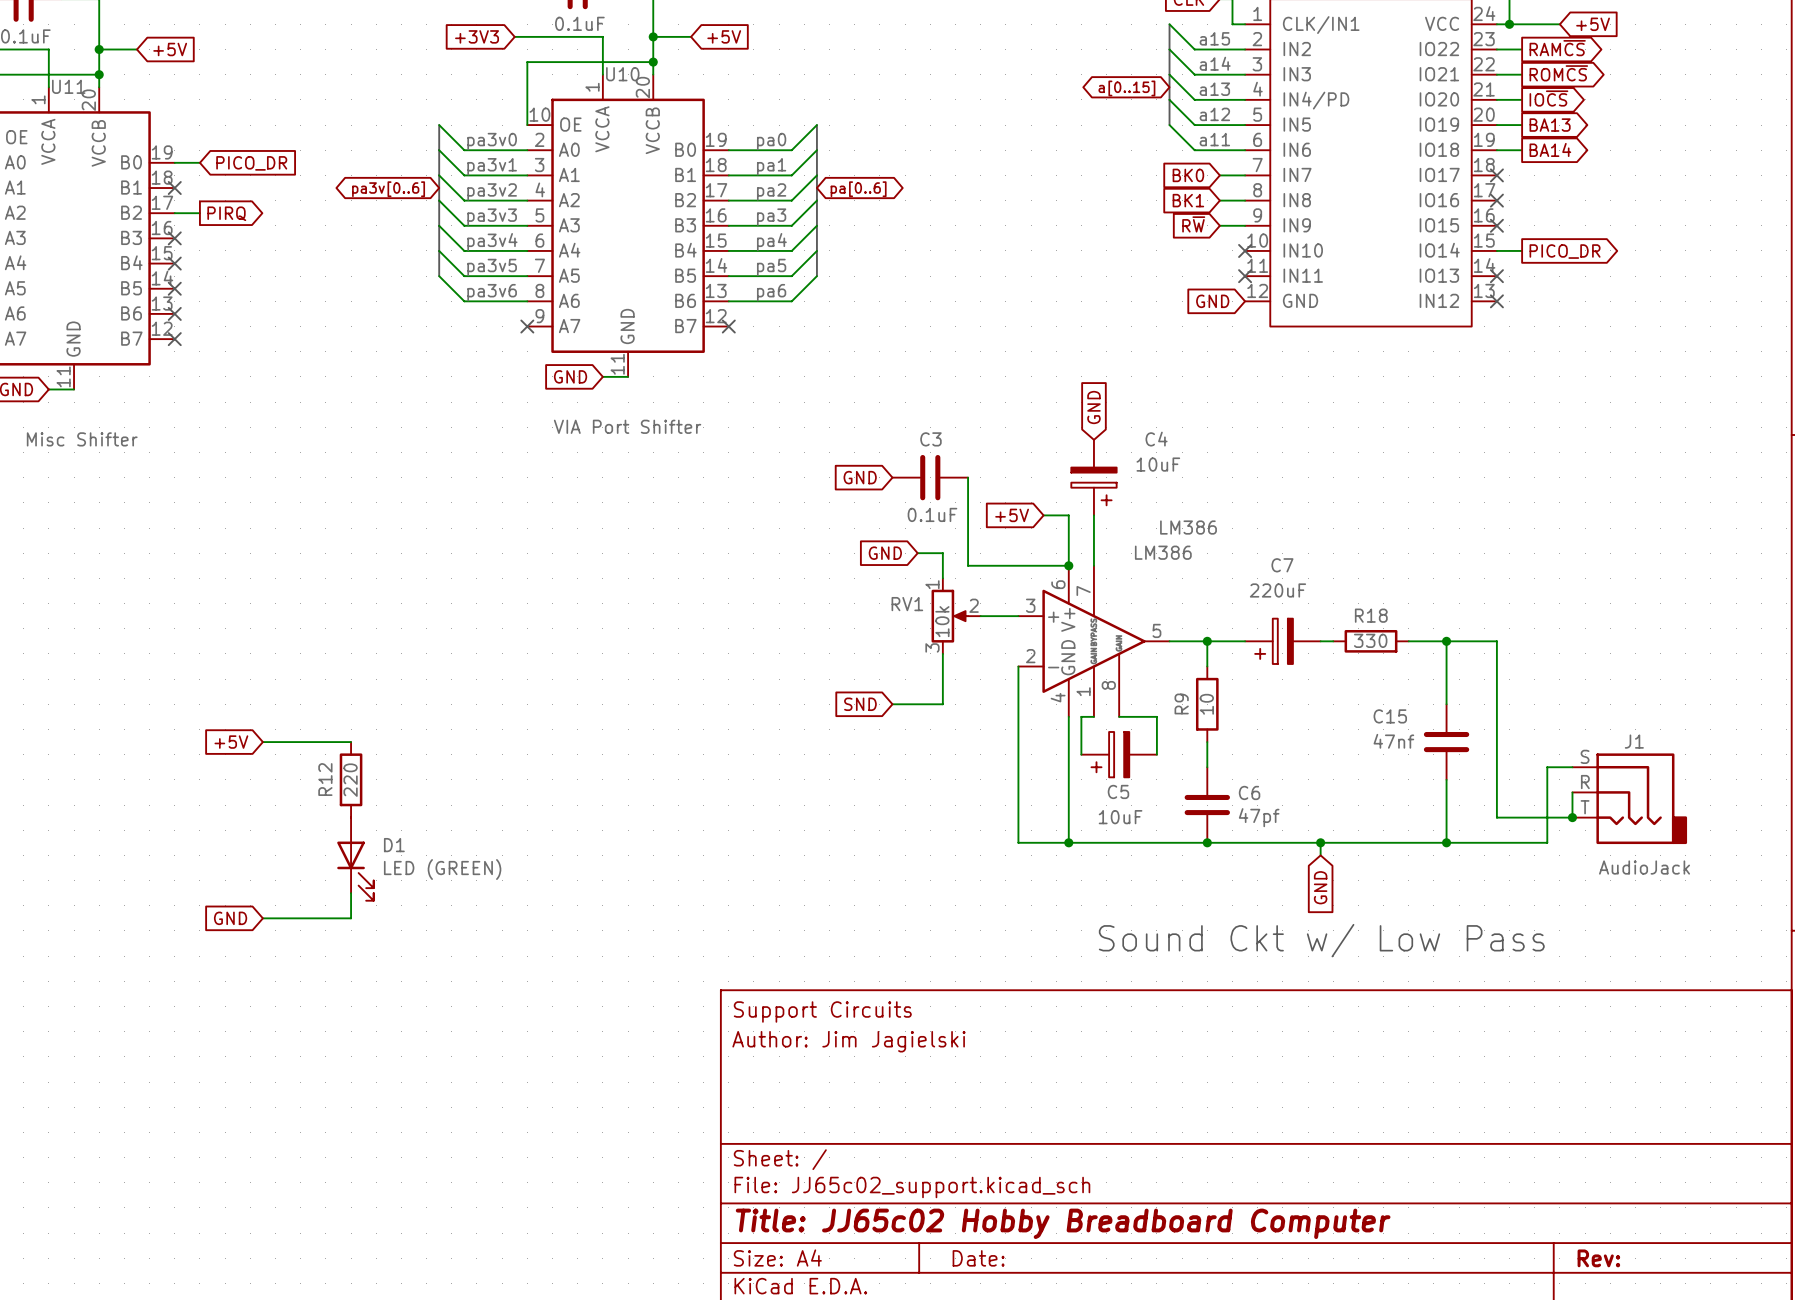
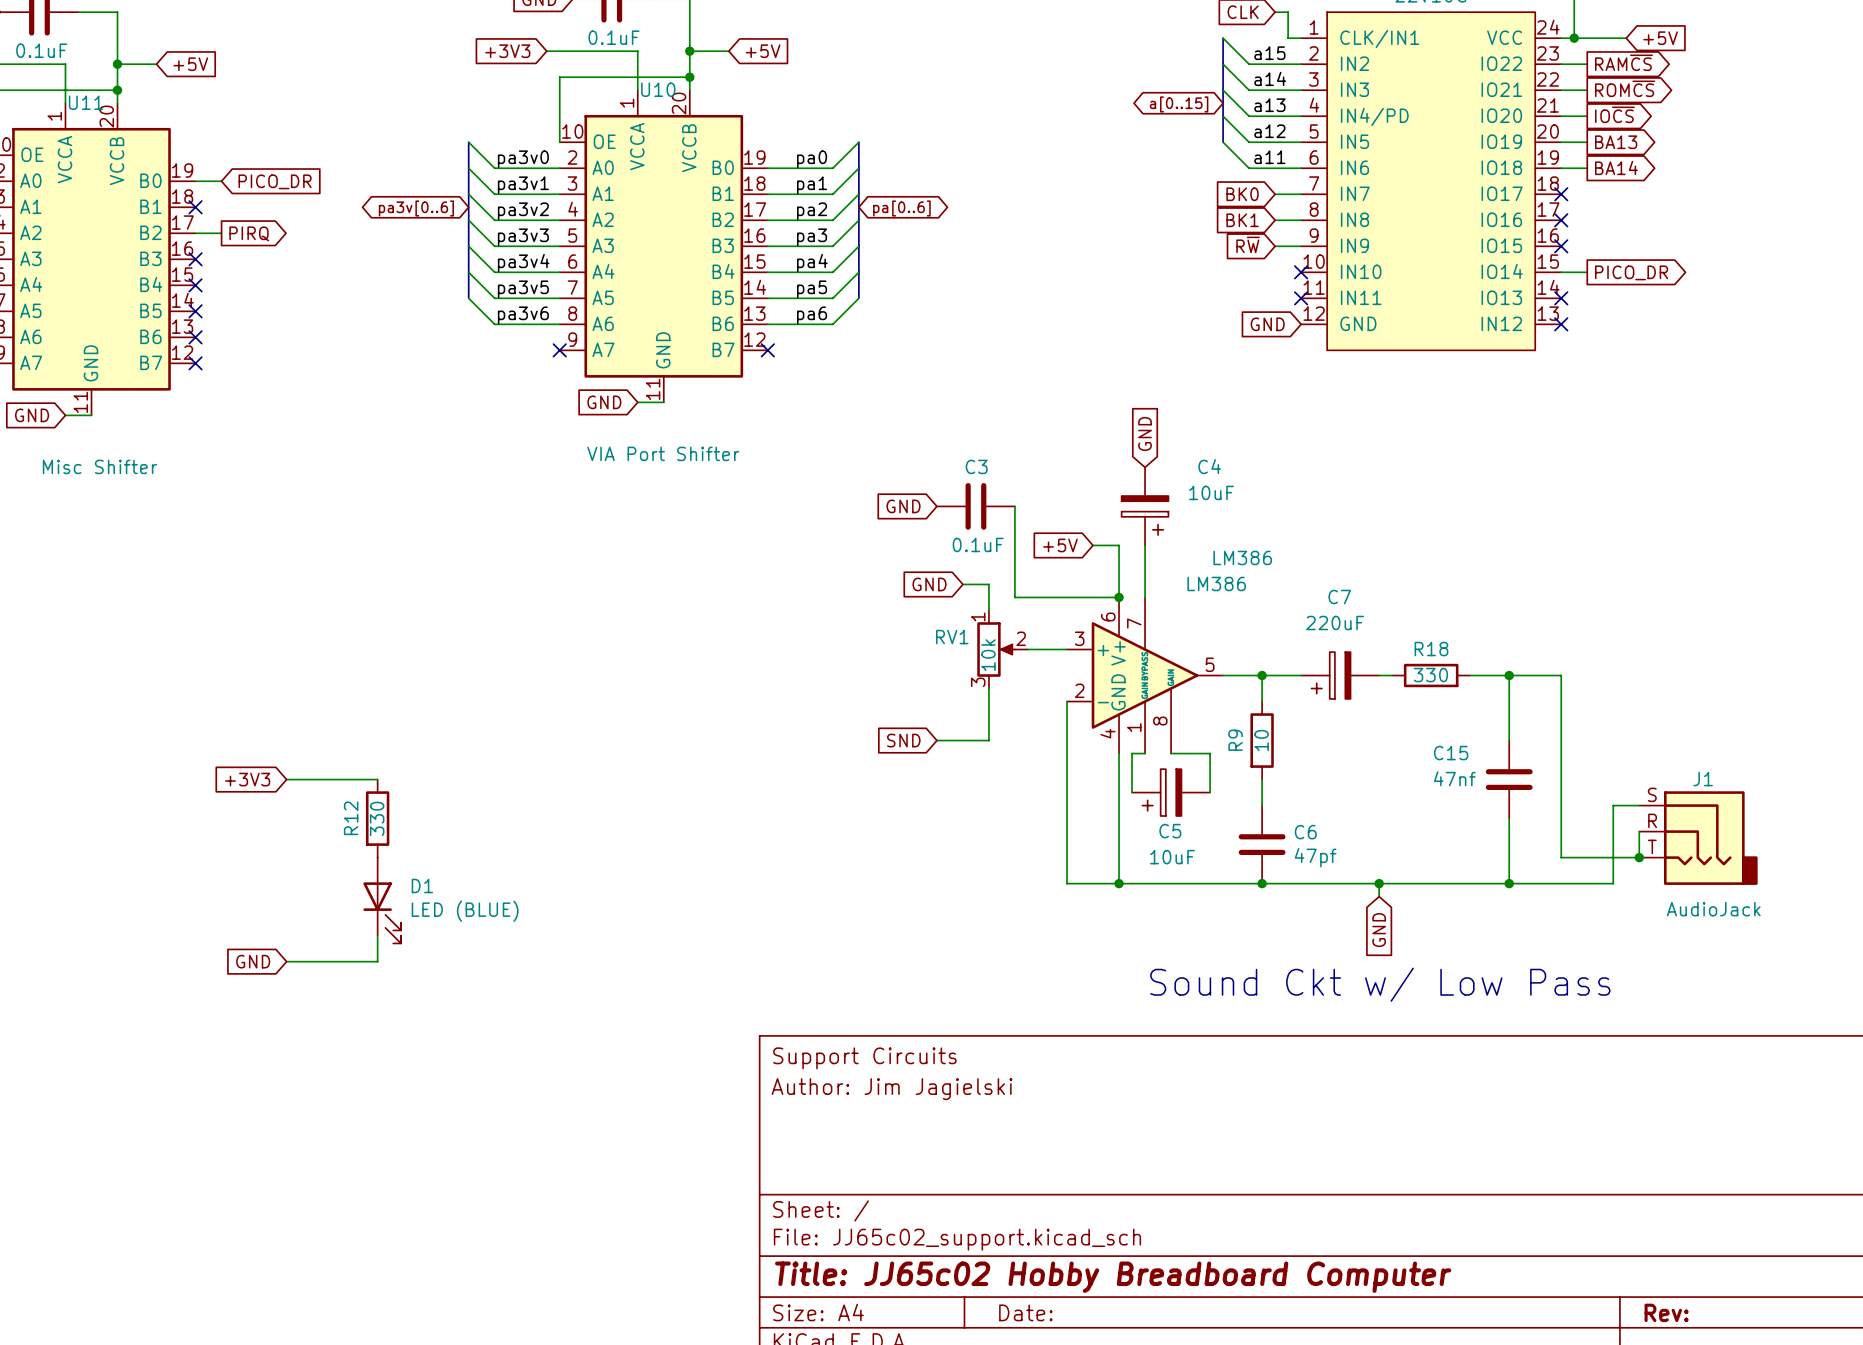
global label: +5V (231, 742) -> +3V3 (247, 779)
R12 value: 220 (350, 780) -> 330 (377, 818)
D1 value: LED (GREEN) (442, 869) -> LED (BLUE) (465, 911)

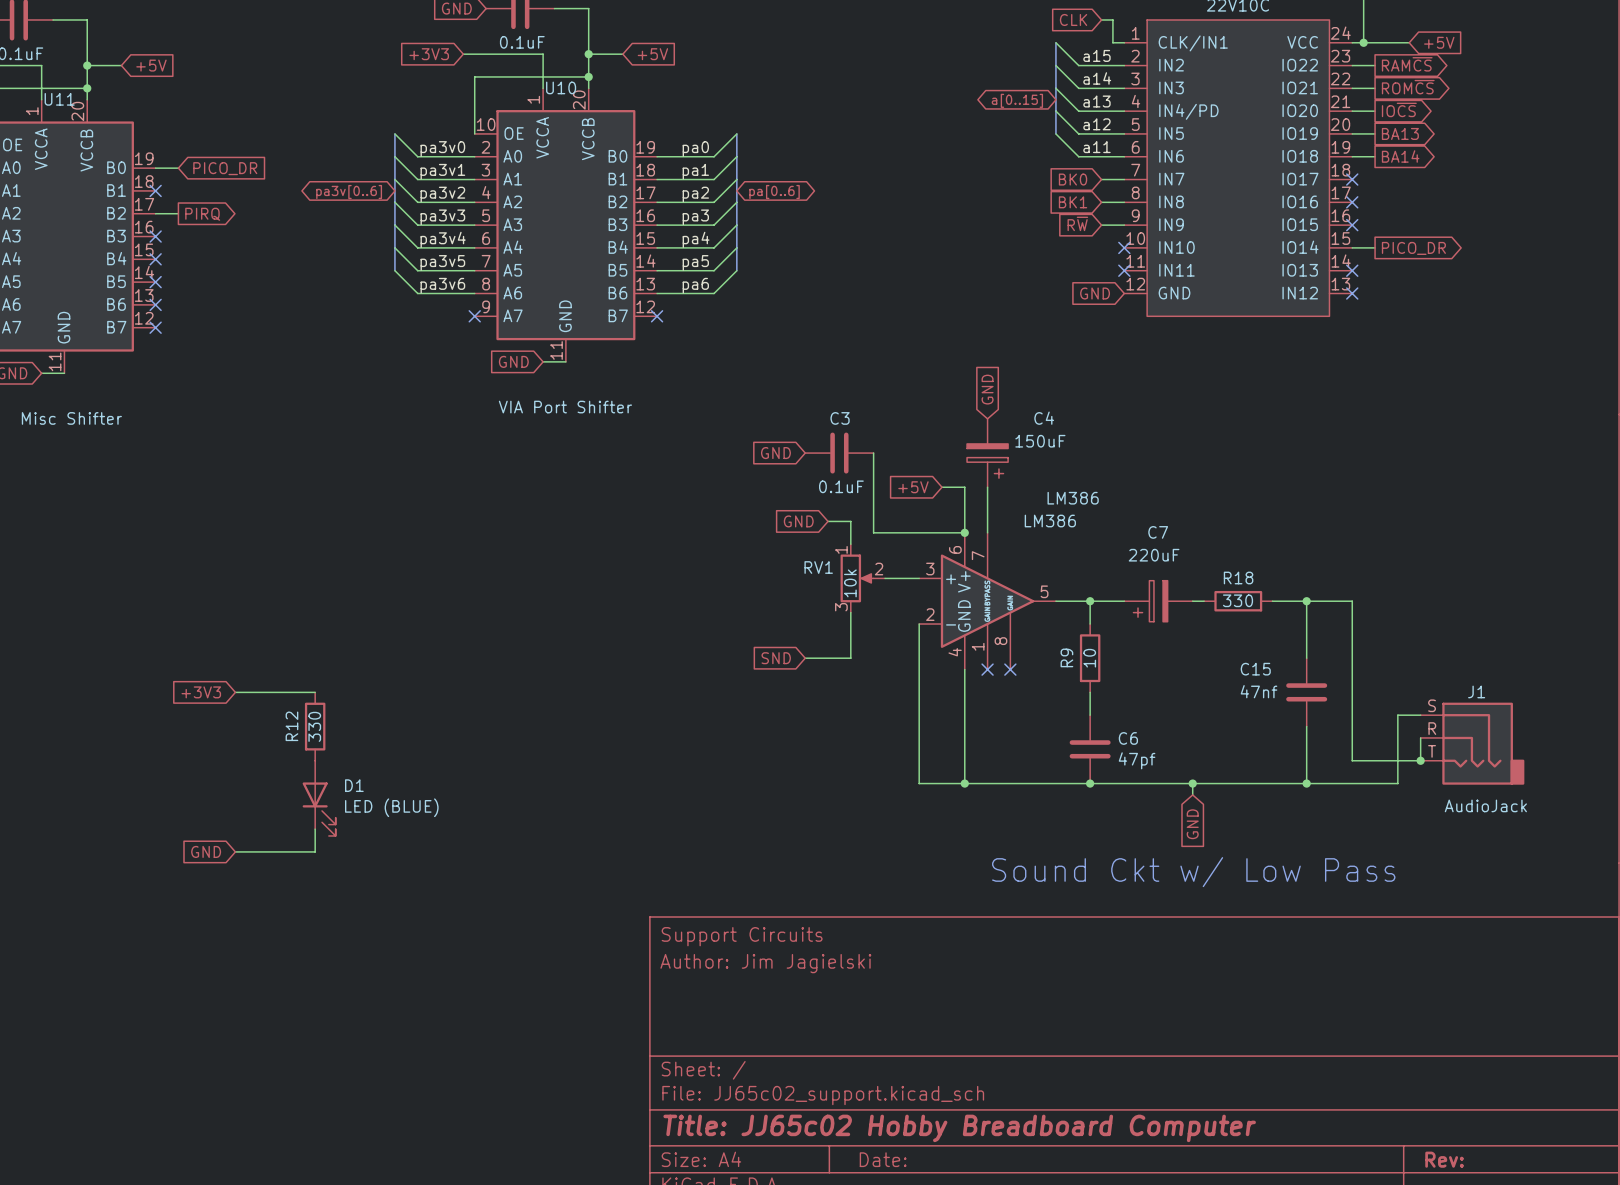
C4 value: 10uF (1211, 492) -> 150uF (1040, 441)
wire: (1145, 753) (1132, 753) (1132, 792) -> none
no-connect mark: none -> (987, 669)
wire: (1171, 753) (1210, 753) (1210, 792) -> none
no-connect mark: none -> (1010, 669)
C5: 10uF (1171, 792) -> none

